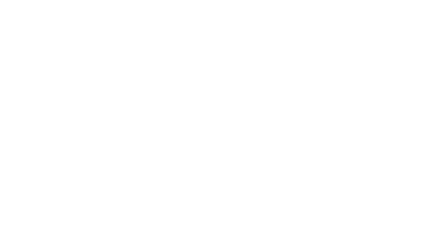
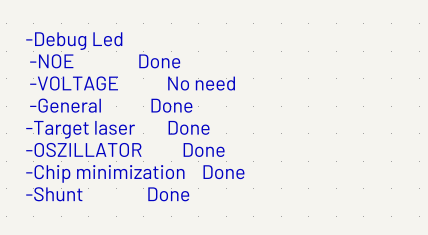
text: none -> -Debug Led (74, 41)
text: none -> -NOE Done (105, 61)
text: none -> -VOLTAGE No need (132, 83)
text: none -> -General Done (111, 105)
text: none -> -Target laser Done (117, 129)
text: none -> -OSZILLATOR Done (125, 149)
text: none -> -Chip minimization Done (135, 173)
text: none -> -Shunt Done (107, 194)

